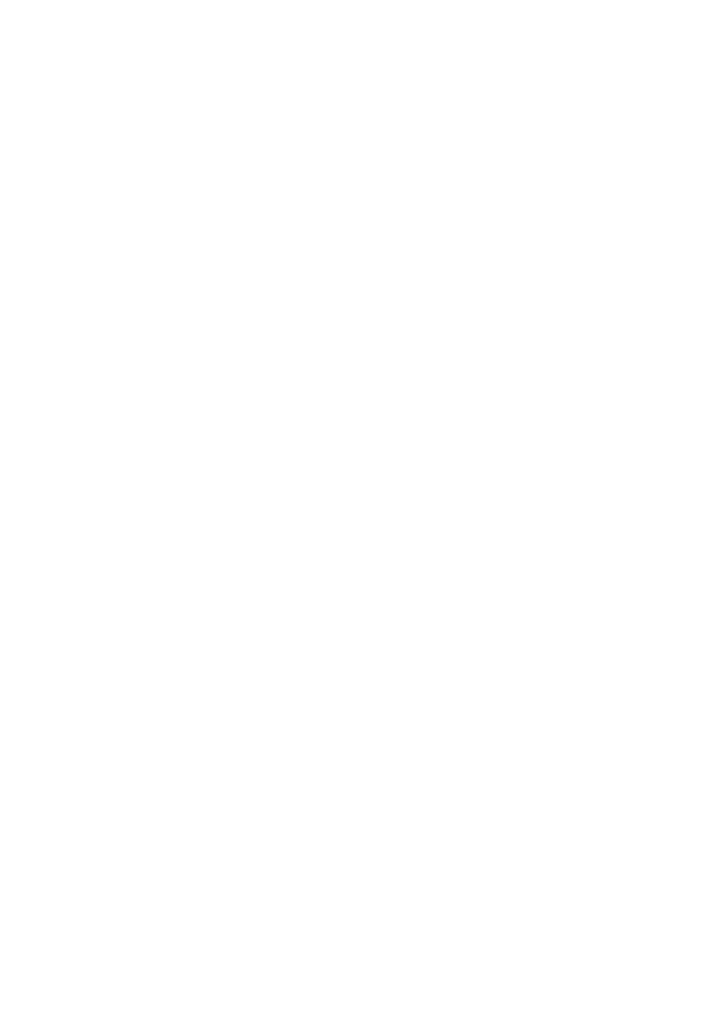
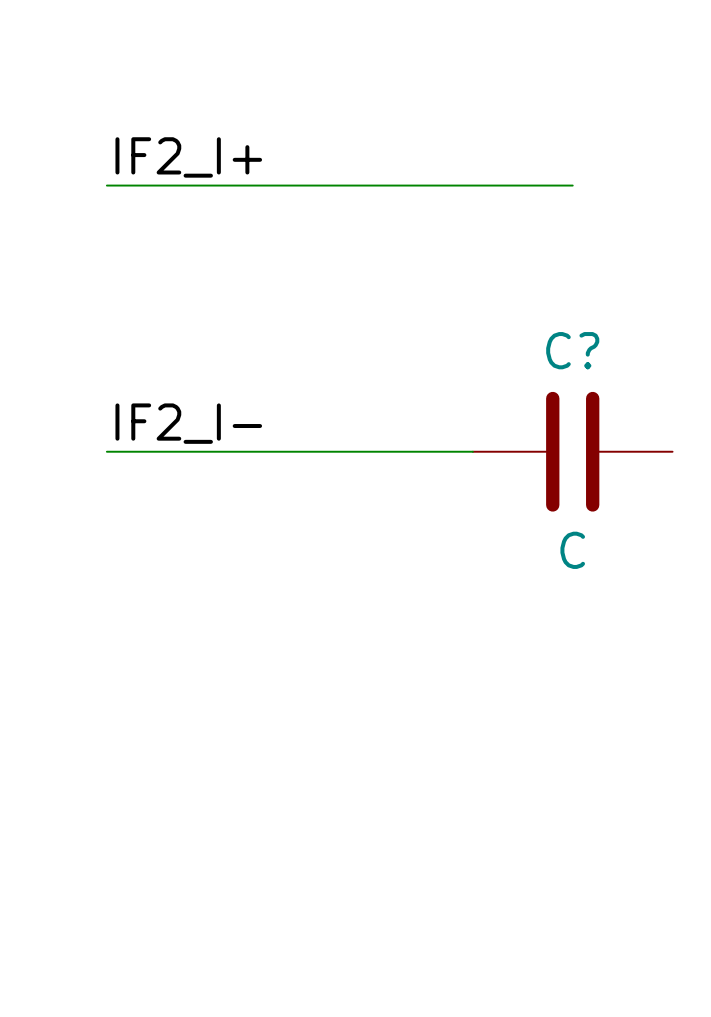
label: none -> IF2_I+ (188, 157)
wire: none -> (106, 185) (572, 185)
label: none -> IF2_I- (188, 423)
wire: none -> (106, 451) (472, 451)
C?: none -> C (572, 451)

